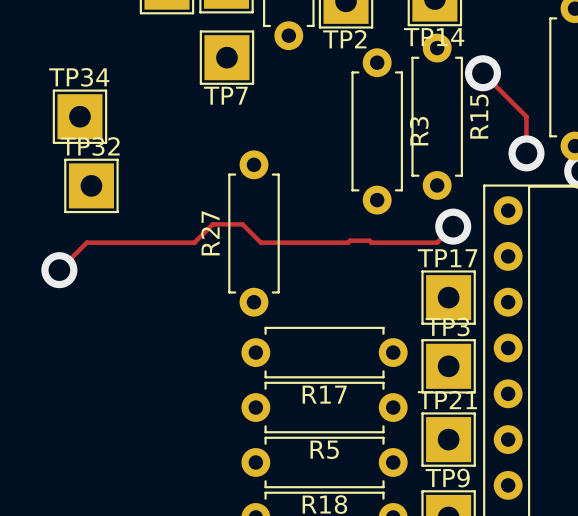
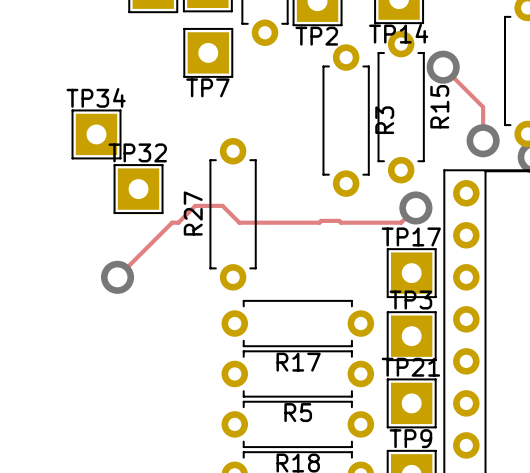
TP34 position: (79, 116) -> (96, 134)
TP32 position: (91, 185) -> (138, 189)
track: (187, 242) (86, 242) (59, 270) -> (172, 222) (117, 277)
via position: (59, 270) -> (117, 277)

